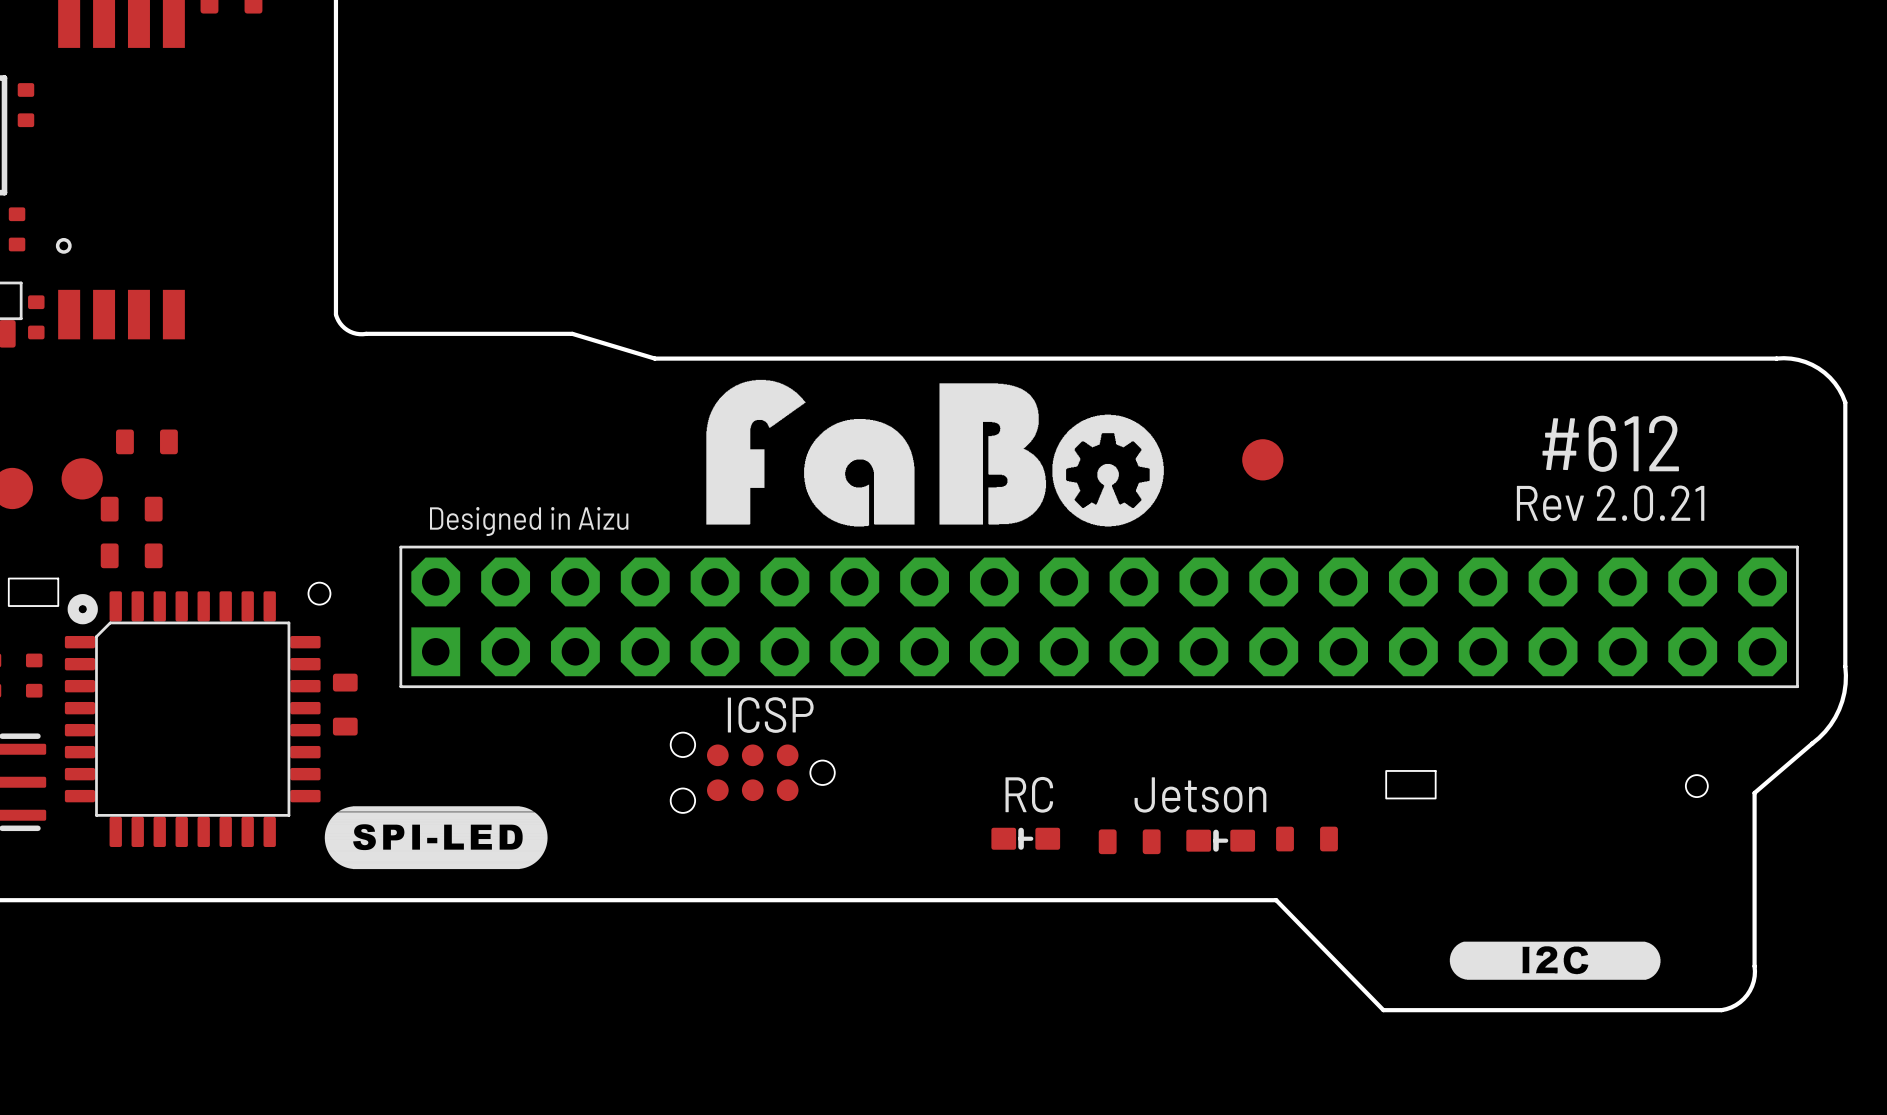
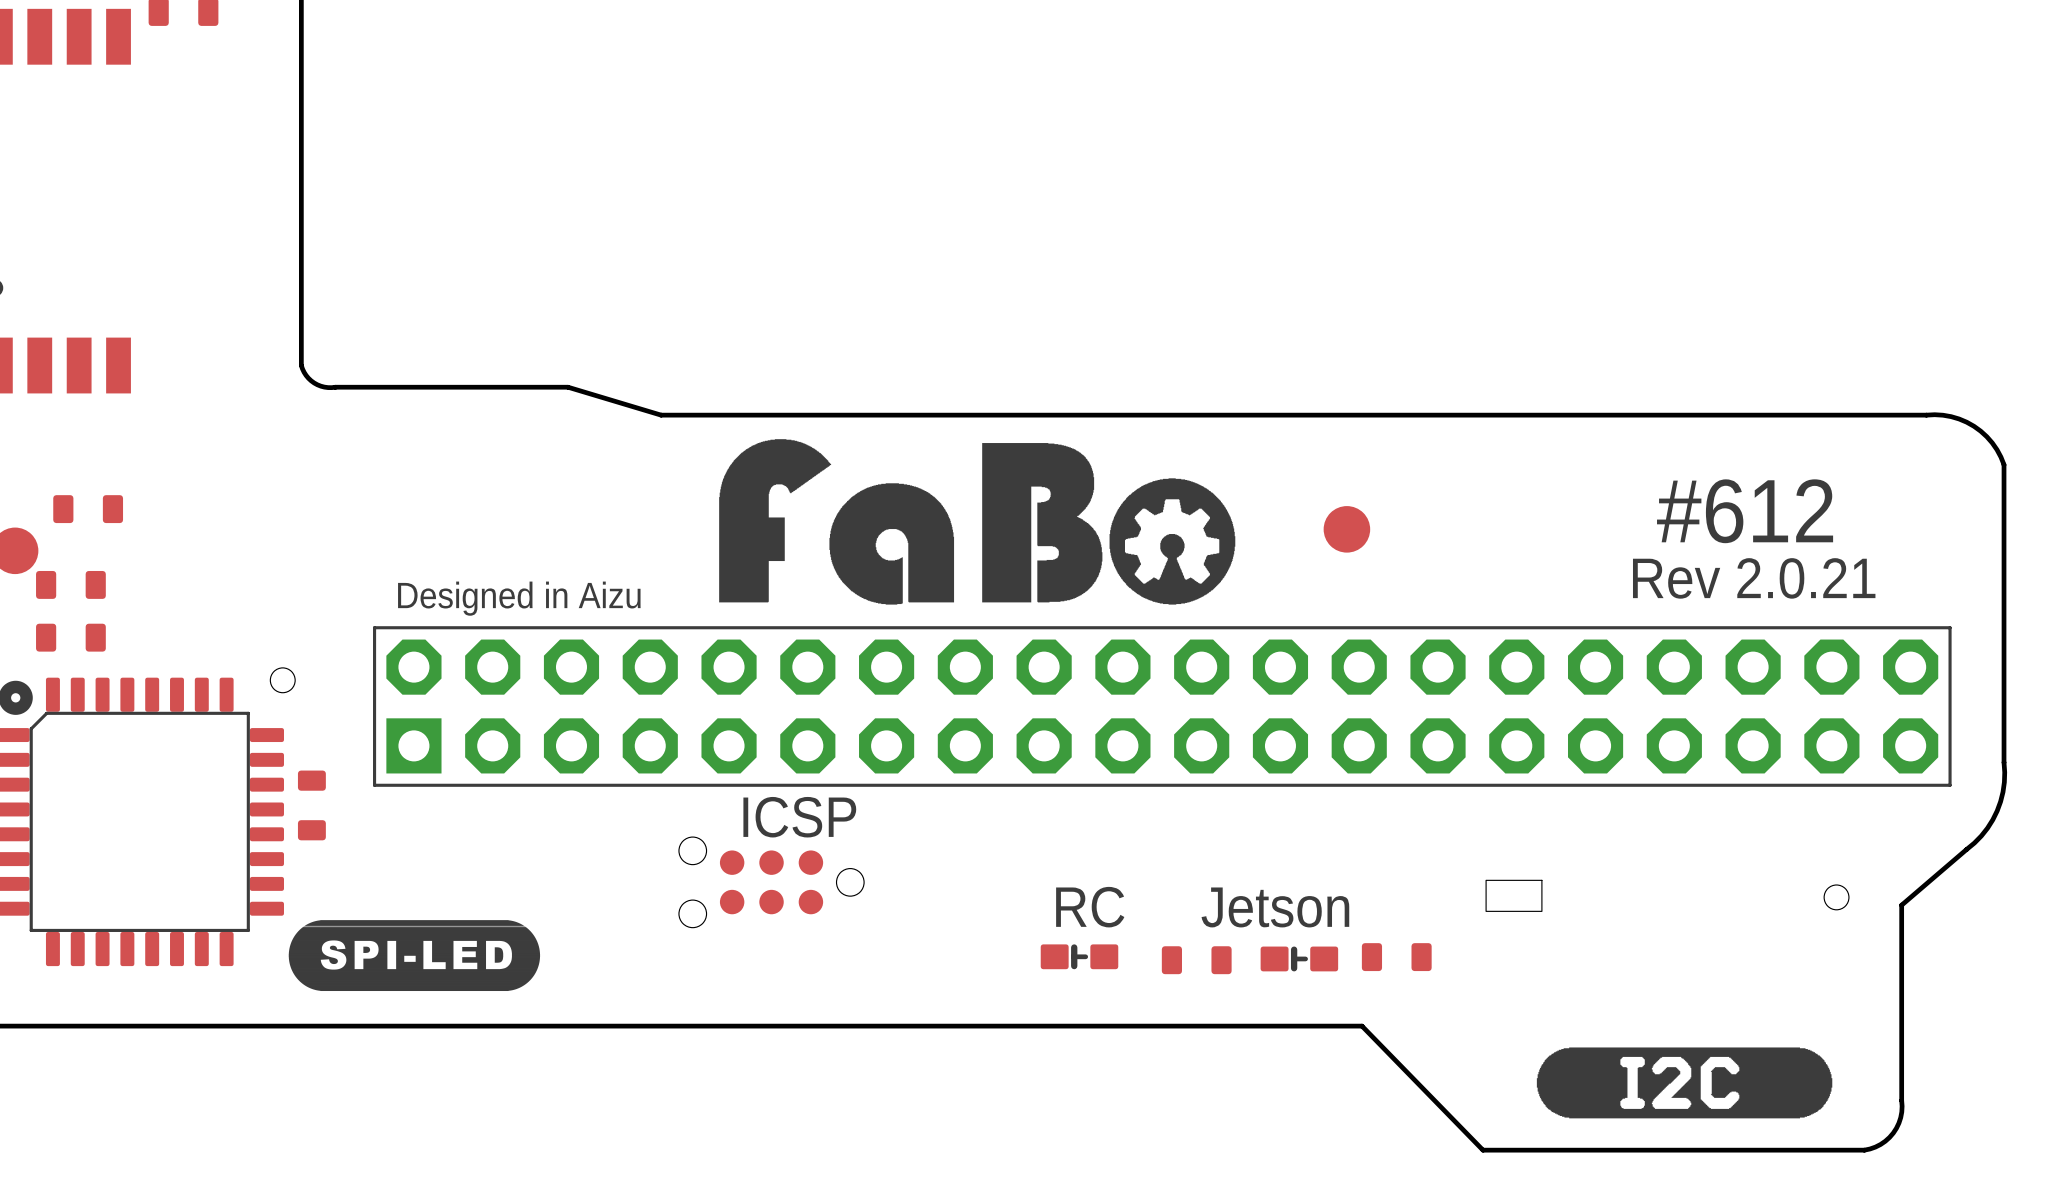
drawing: none -> [1536, 1047, 1833, 1119]
drawing: [1449, 941, 1661, 980] -> none

